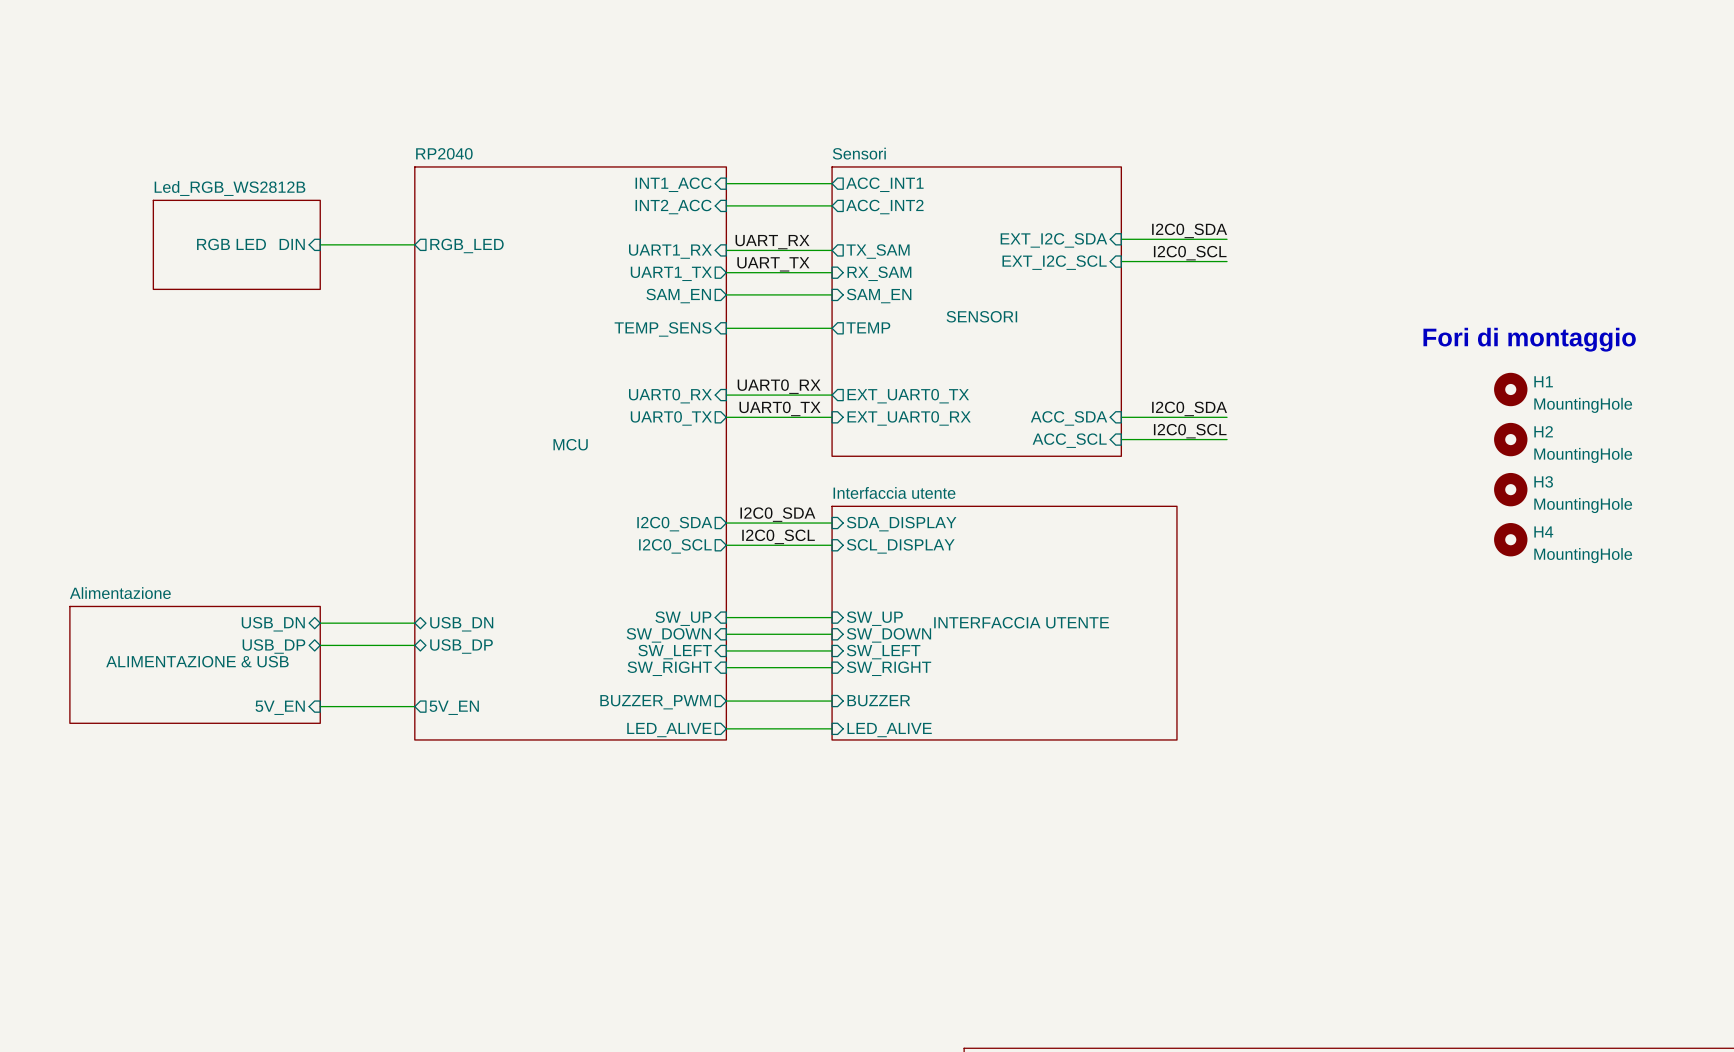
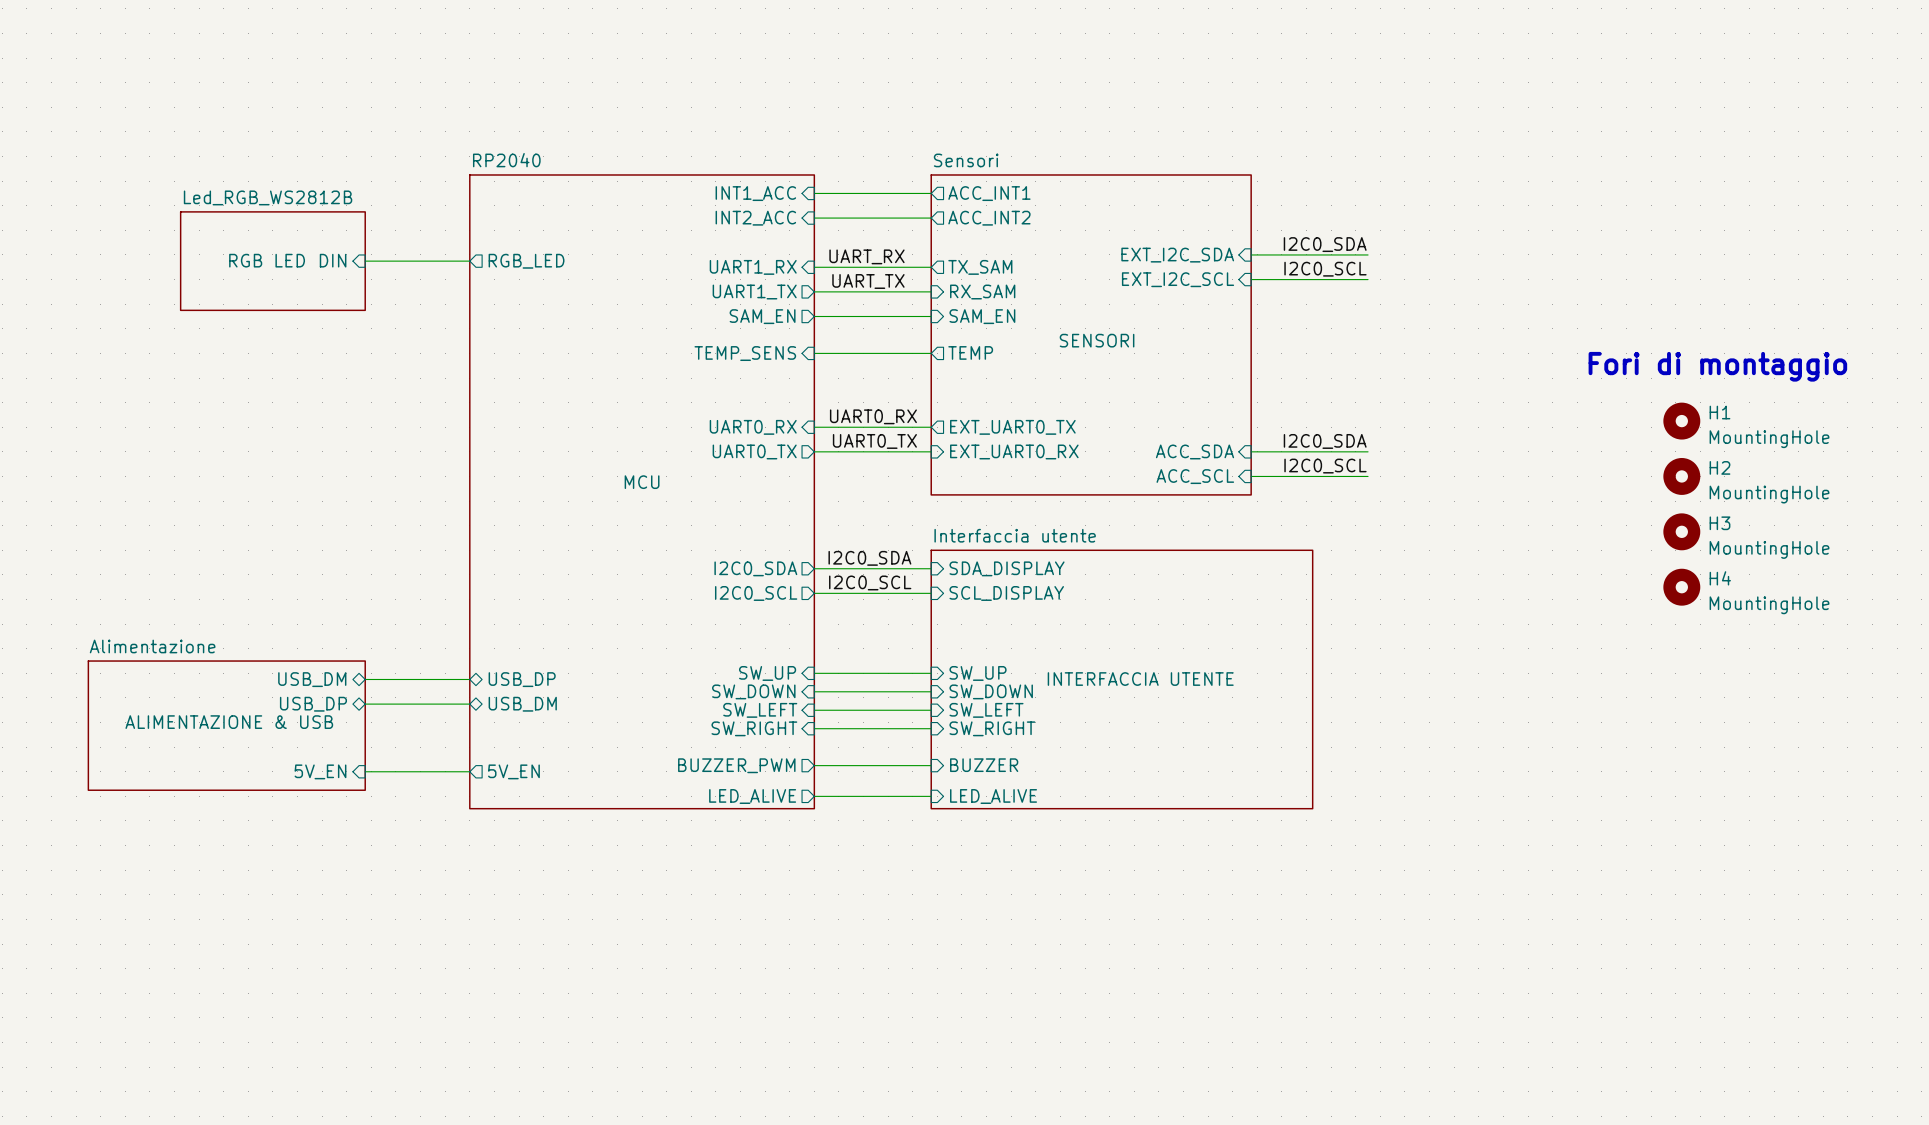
sheet pin: USB_DN (273, 624) -> USB_DM (312, 679)
sheet pin: USB_DN (461, 624) -> USB_DP (522, 679)
sheet pin: USB_DP (461, 646) -> USB_DM (522, 704)

